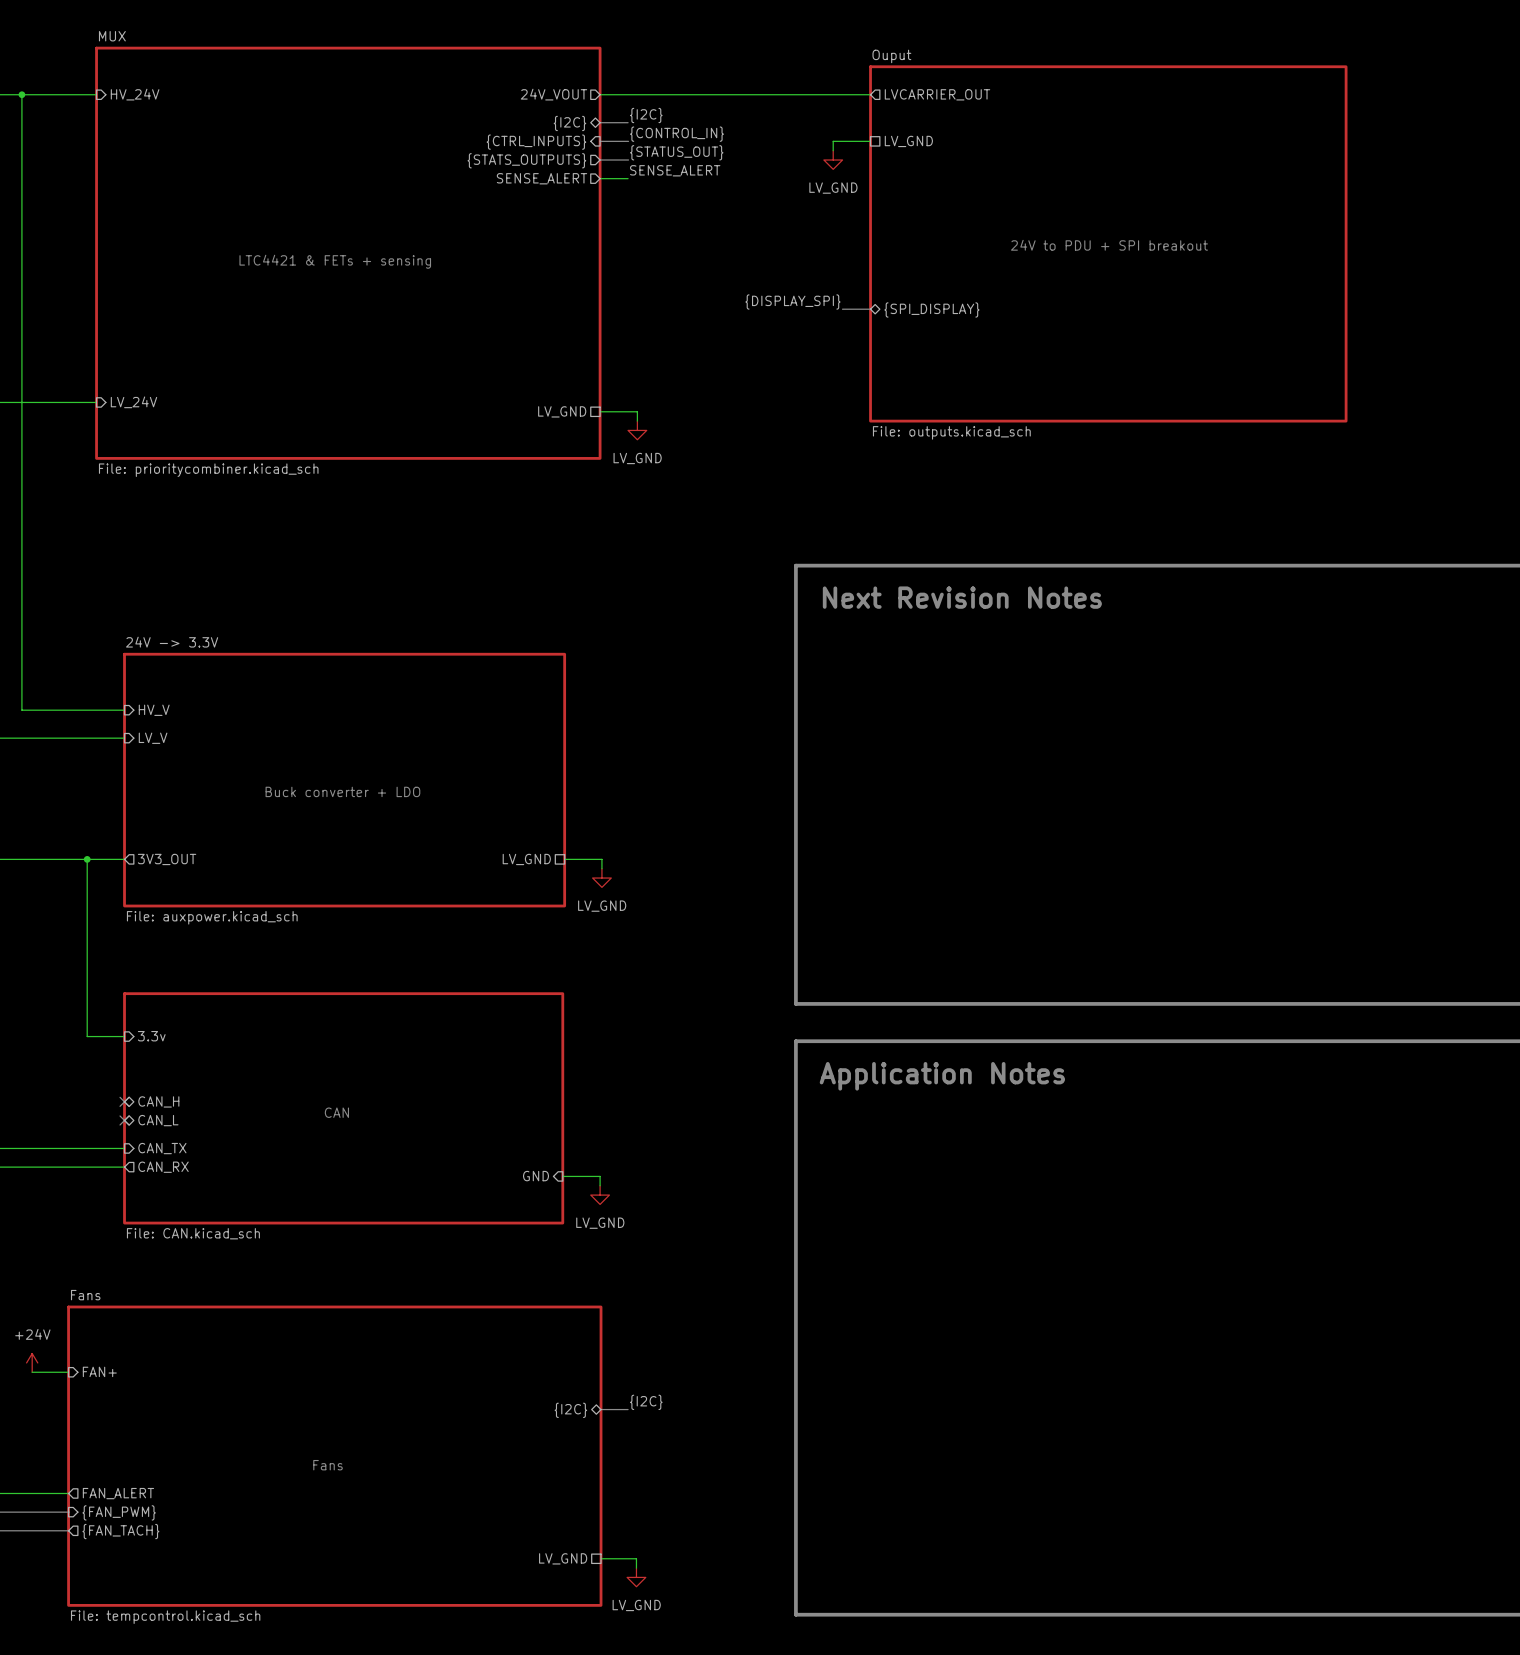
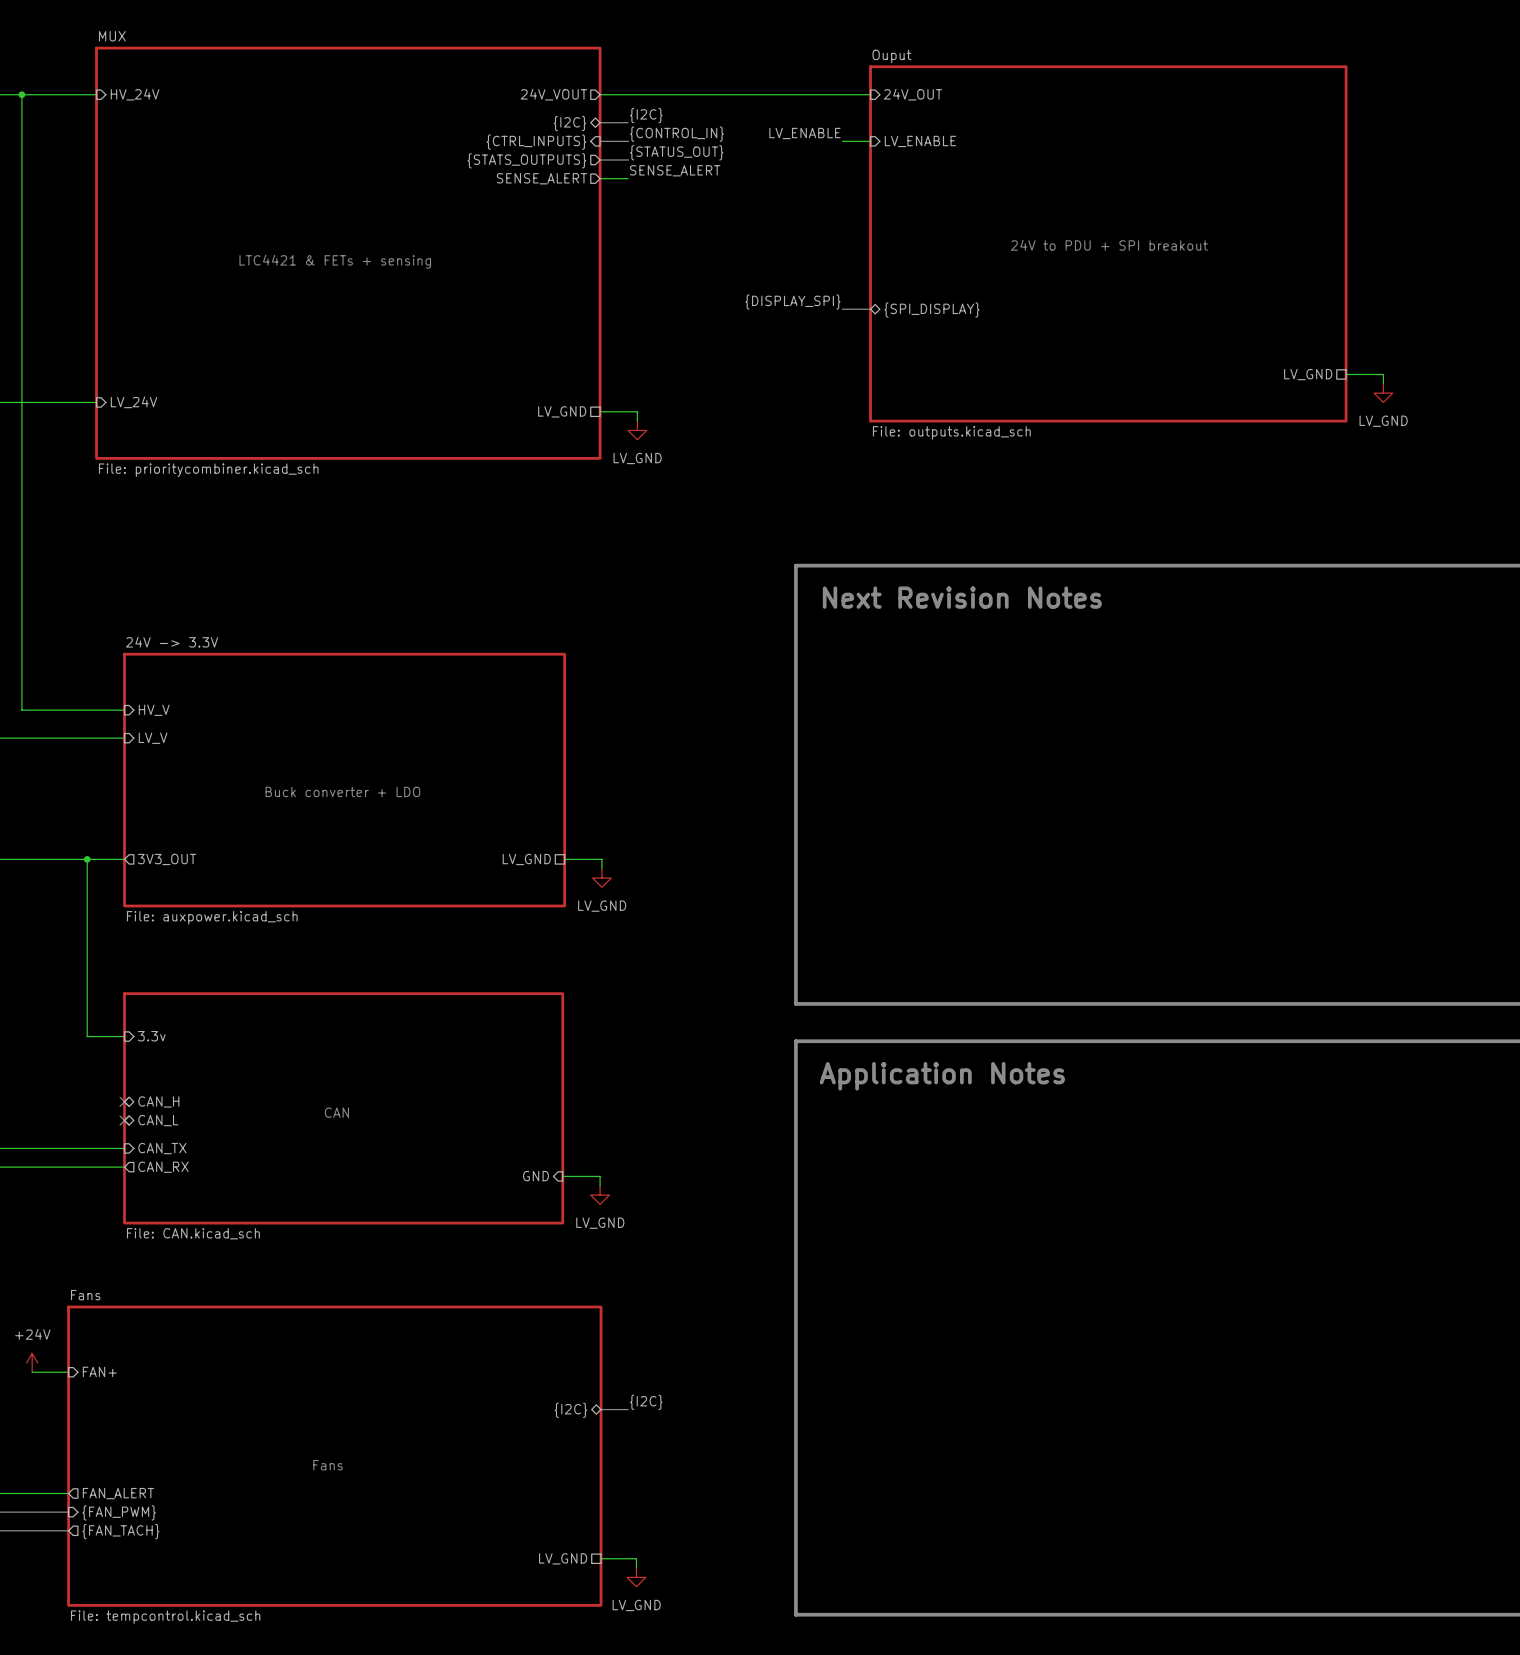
sheet pin shape: output (937, 94) -> input (913, 94)
sheet pin: LVCARRIER_OUT (937, 94) -> 24V_OUT (913, 94)
label: none -> LV_ENABLE (804, 133)
wire: (842, 141) (833, 141) (833, 150) -> none
sheet pin shape: passive (908, 141) -> input (920, 141)
sheet pin: LV_GND (908, 141) -> LV_ENABLE (920, 141)
power symbol: LV_GND (833, 160) -> none
sheet pin: none -> LV_GND (1308, 374)
wire: none -> (1346, 374) (1383, 374) (1383, 383)
power symbol: none -> LV_GND (1383, 393)

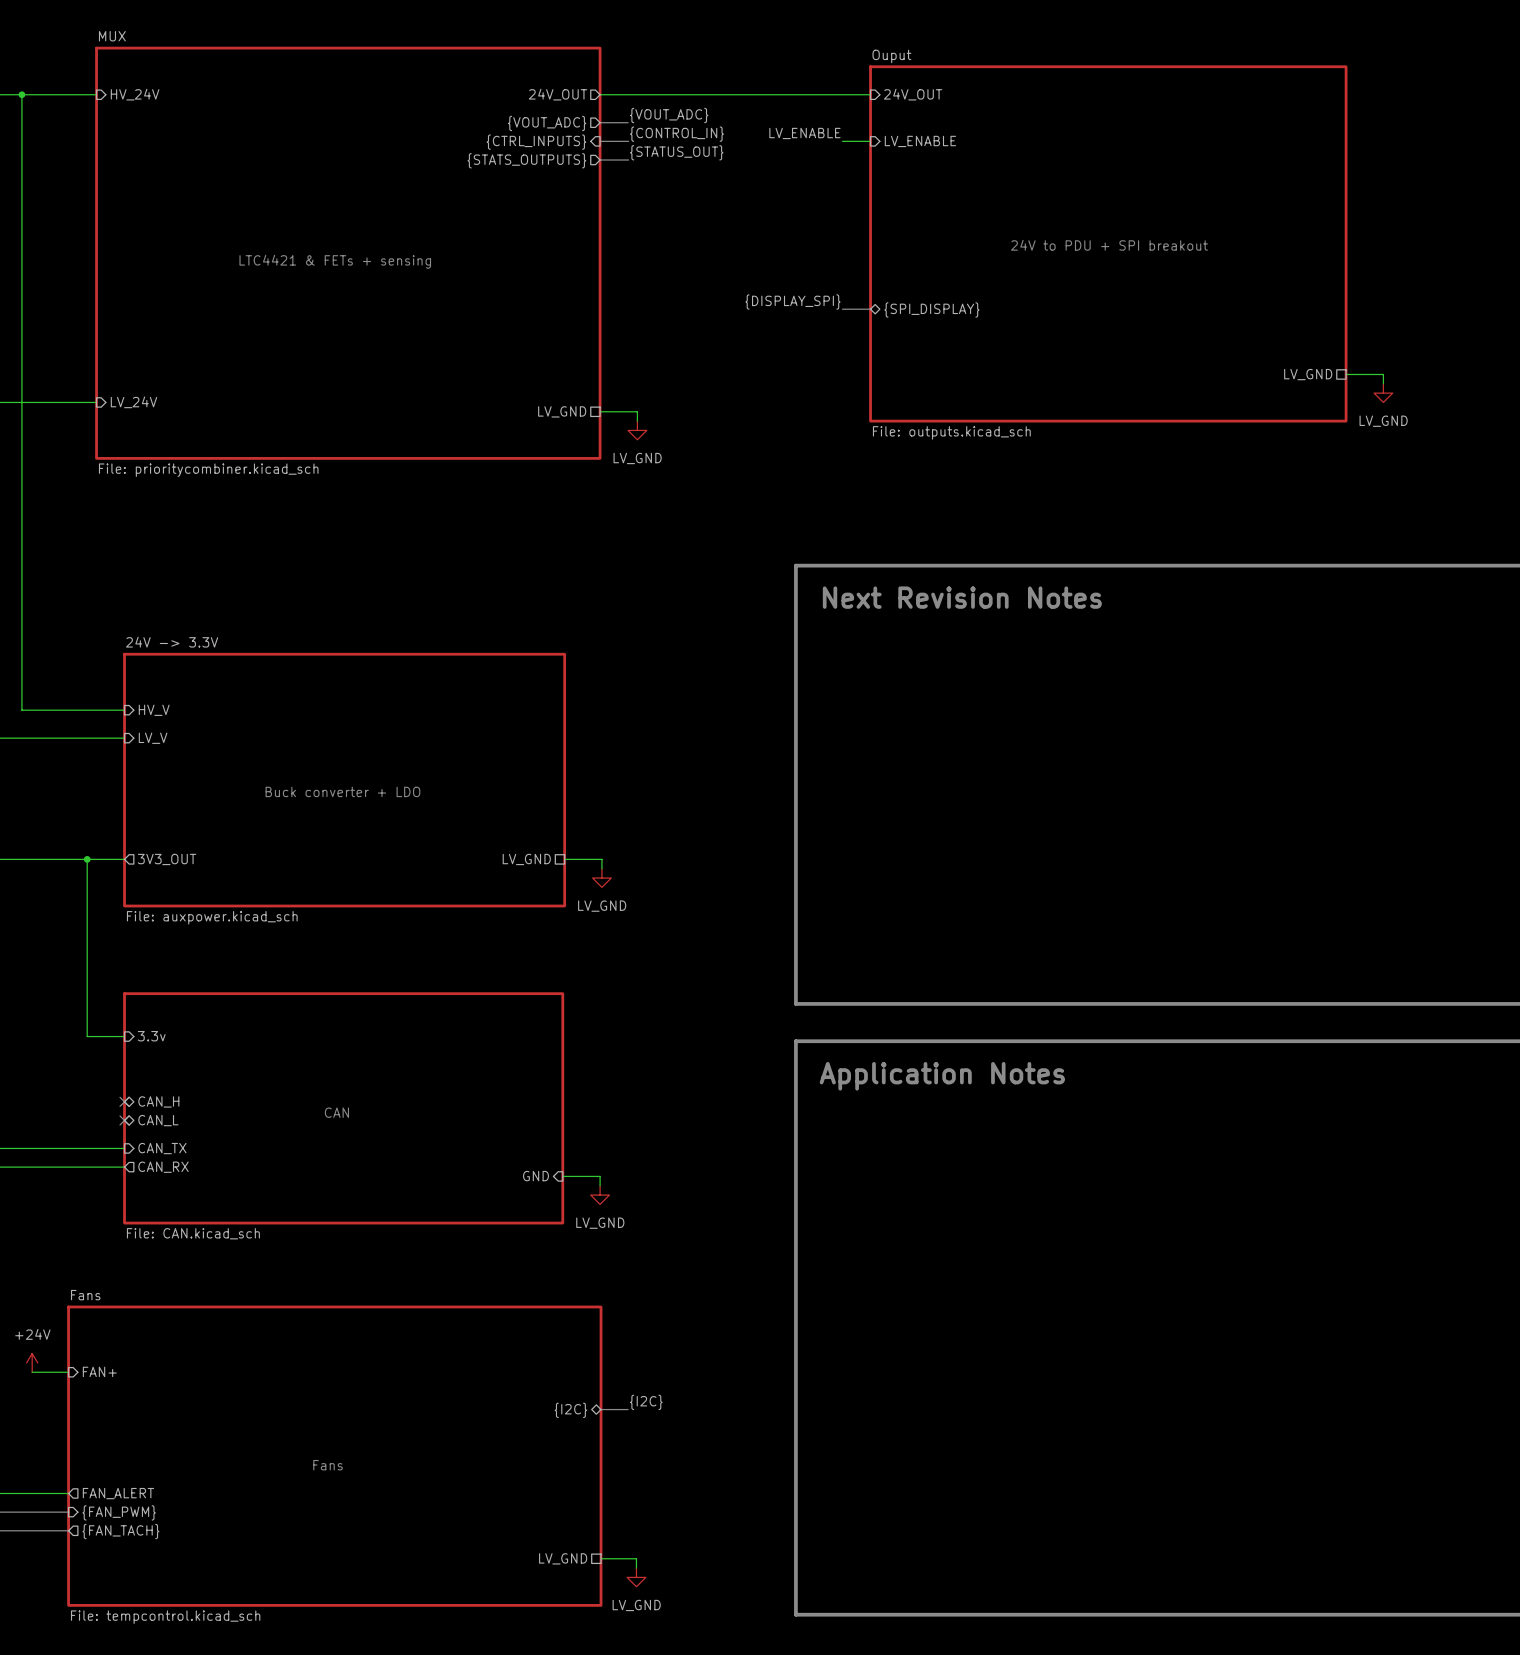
sheet pin: 24V_VOUT (553, 94) -> 24V_OUT (557, 94)
label: {I2C} (646, 115) -> {VOUT_ADC} (669, 115)
sheet pin shape: bidirectional (569, 123) -> output (547, 123)
sheet pin: {I2C} (569, 123) -> {VOUT_ADC} (547, 123)
label: SENSE_ALERT (675, 170) -> none
sheet pin: SENSE_ALERT (541, 178) -> none
wire: (600, 178) (628, 178) -> none

